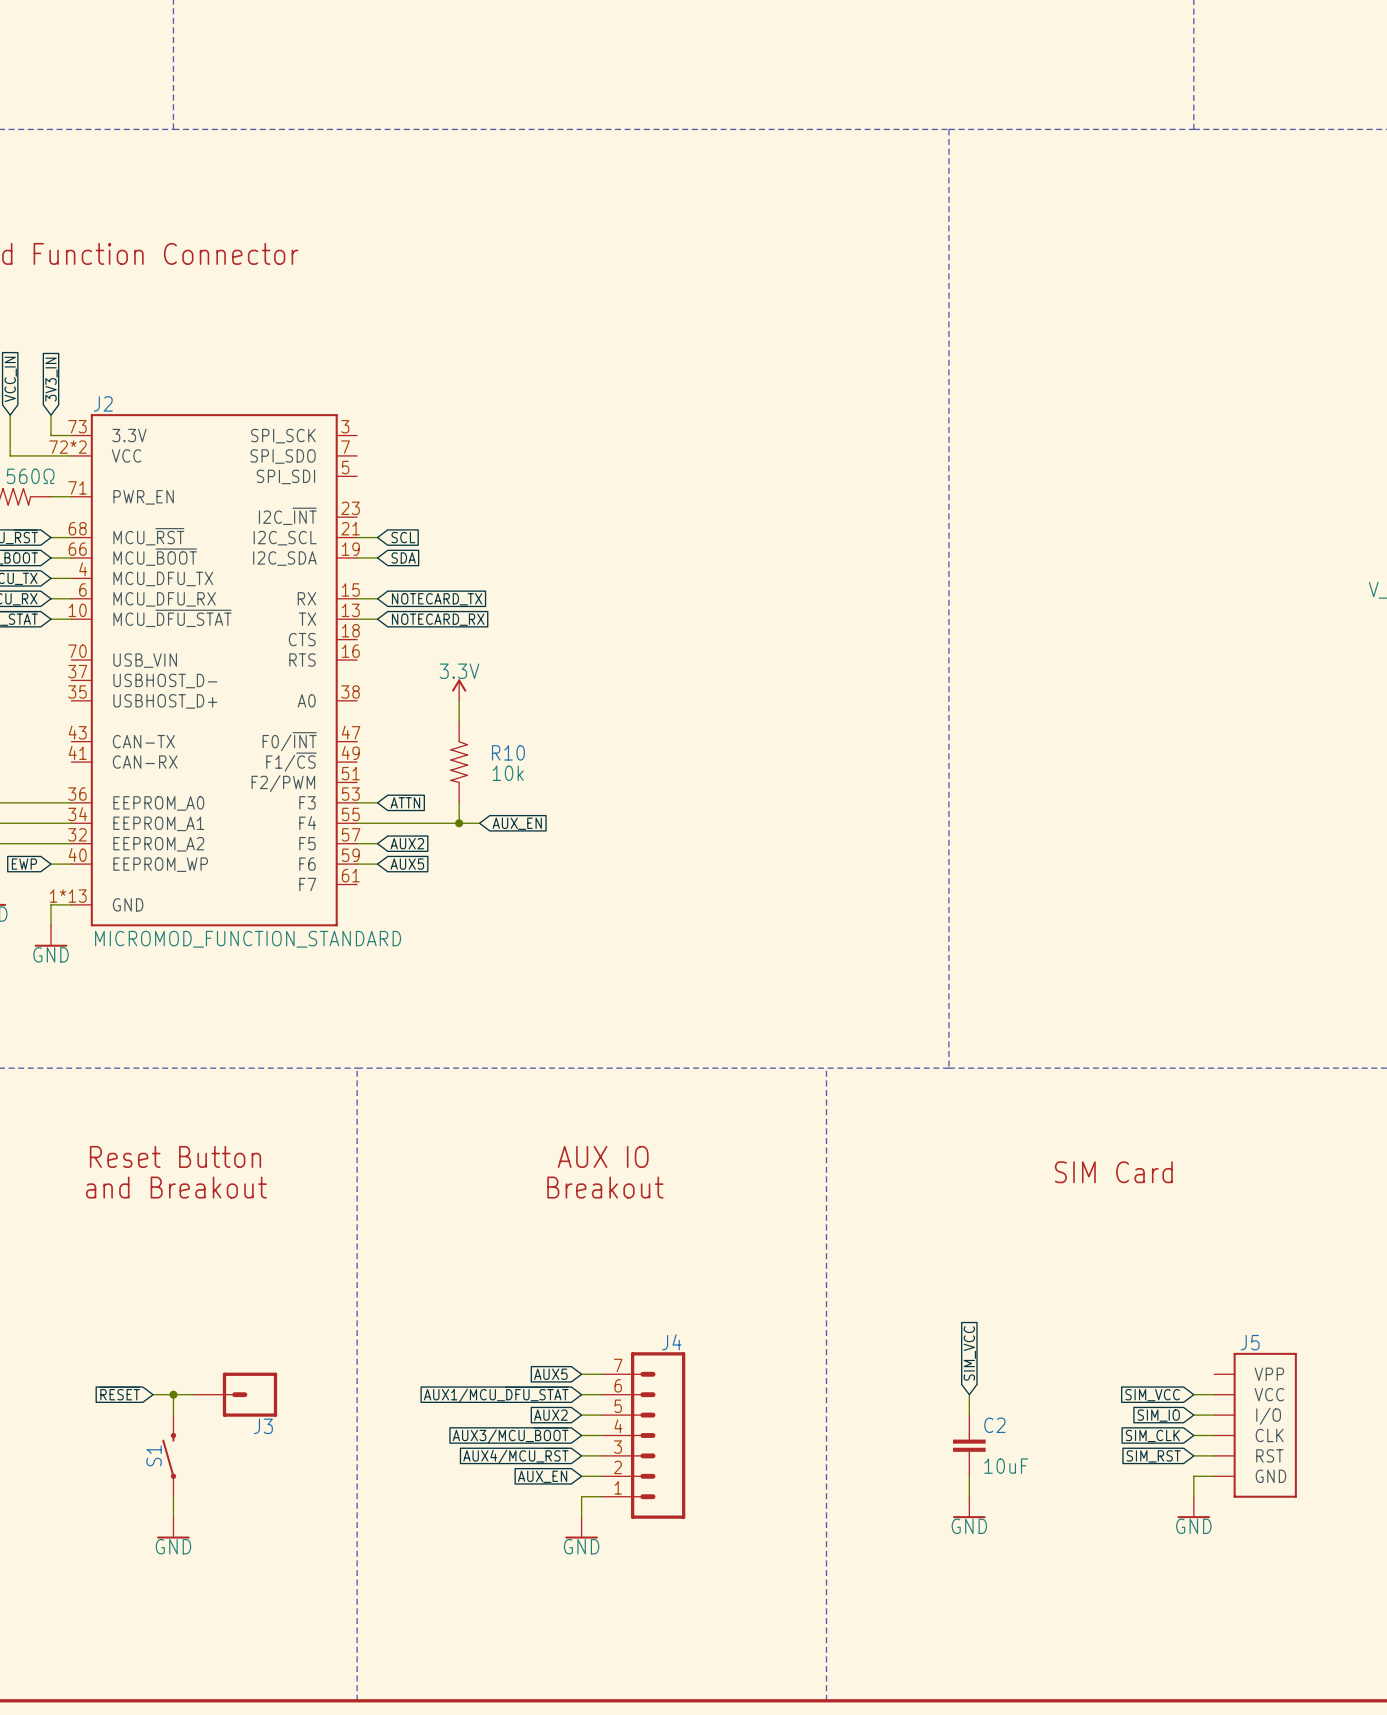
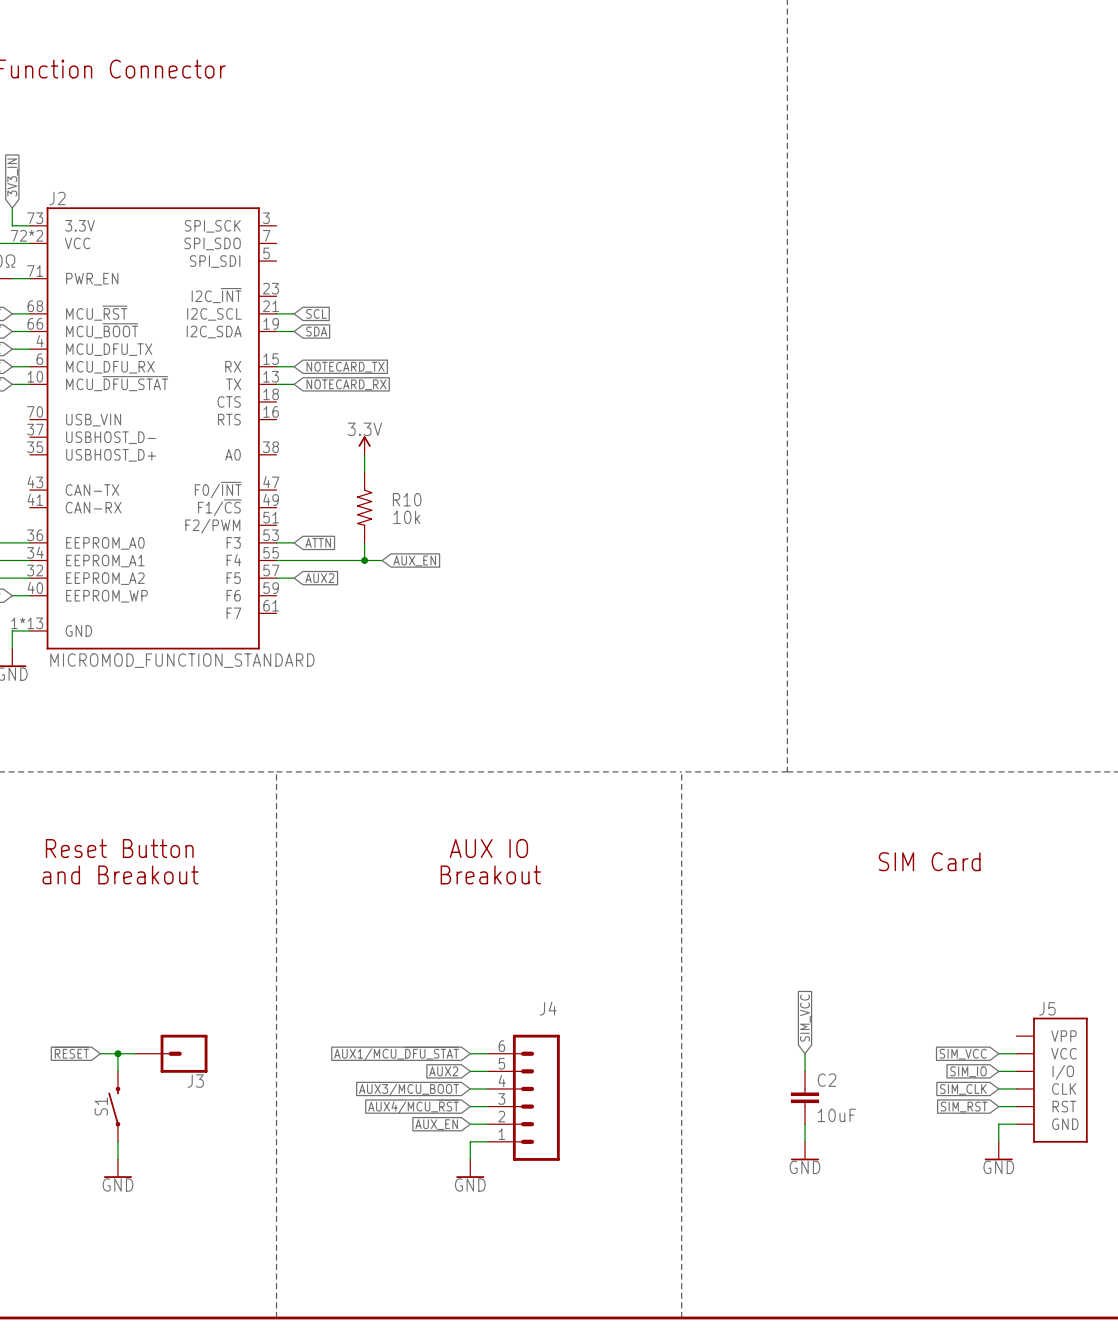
wire: (357, 864) (377, 864) -> none
global label: AUX5 (407, 864) -> none
J4 symbol: [602, 1352, 686, 1519] -> [487, 1034, 560, 1161]
global label: AUX5 (550, 1374) -> none
wire: (581, 1374) (602, 1374) -> none

